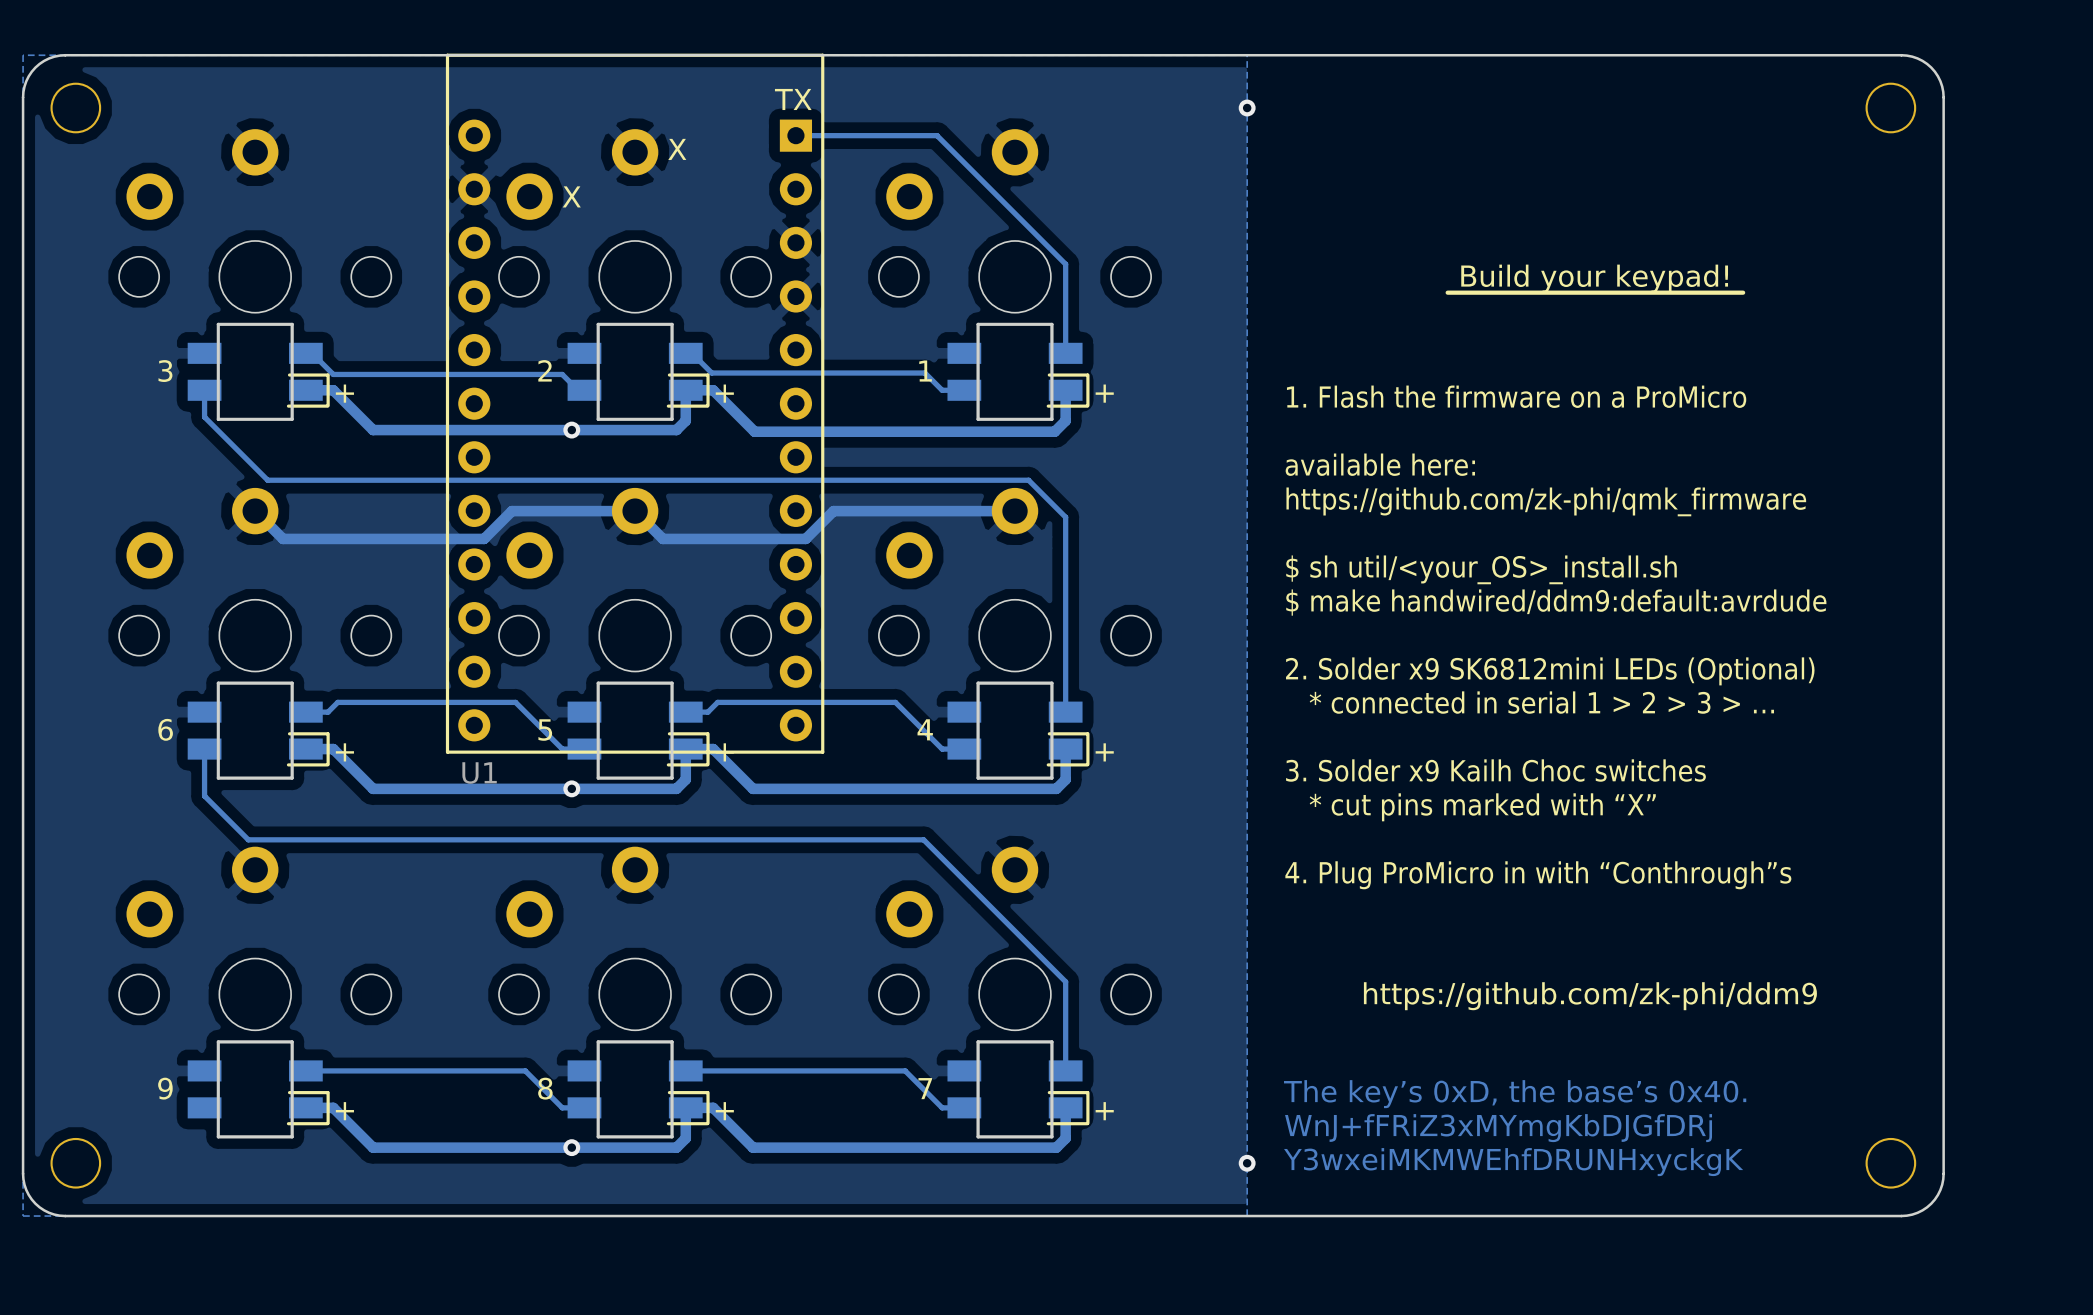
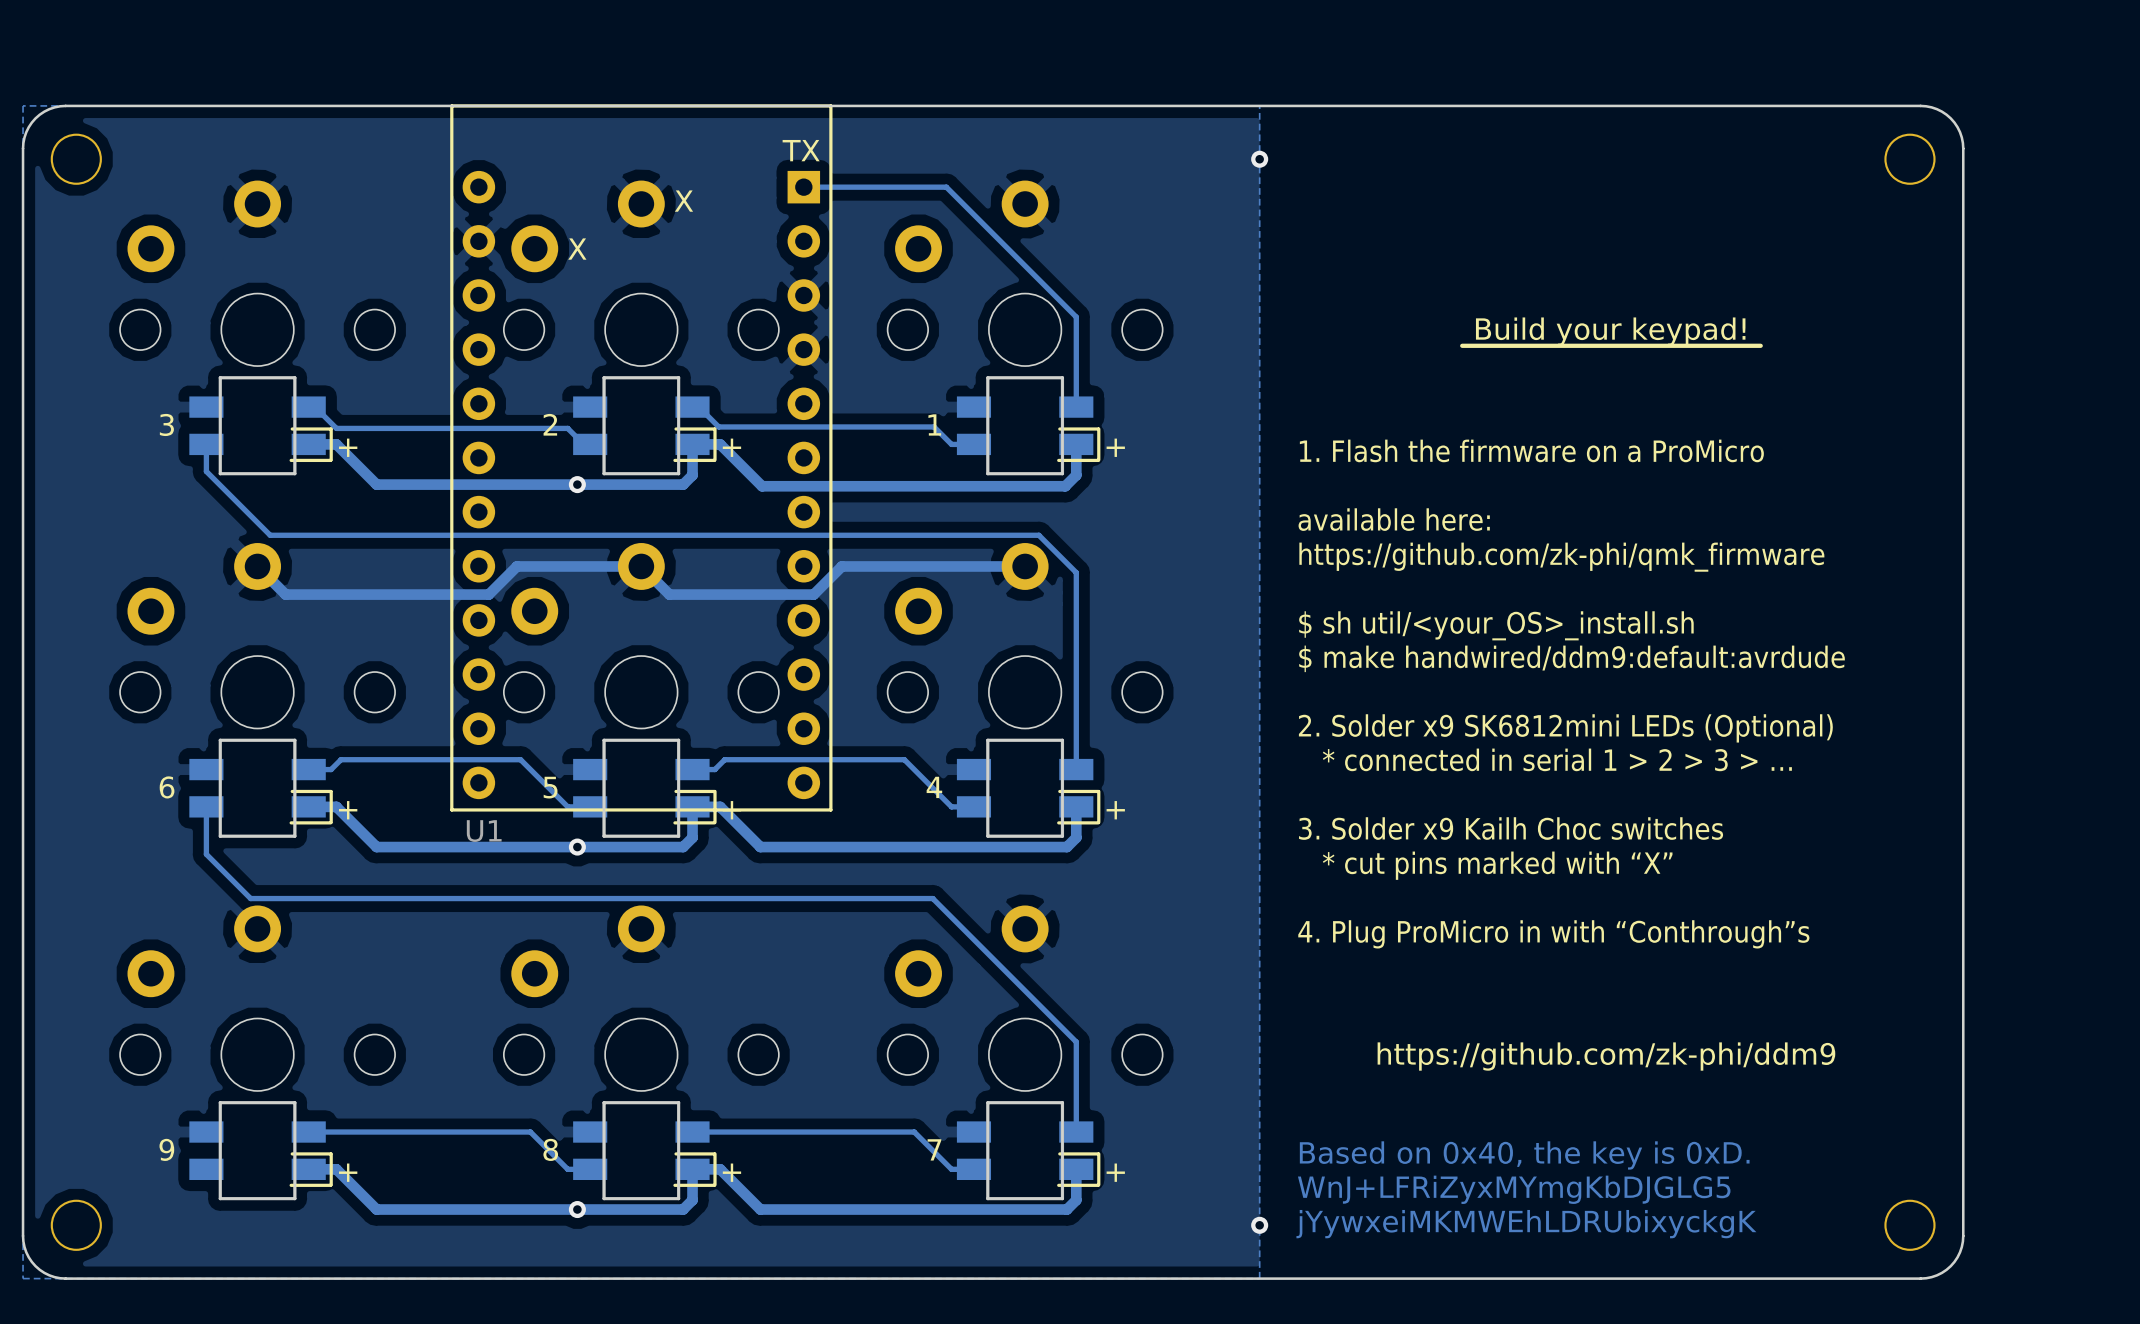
text: The key’s 0xD, the base’s 0x40. (1515, 1094) -> Based on 0x40, the key is 0xD. (1524, 1155)
text: WnJ+fFRiZ3xMYmgKbDJGfDRj (1498, 1128) -> WnJ+LFRiZyxMYmgKbDJGLG5 (1514, 1189)
text: Y3wxeiMKMWEhfDRUNHxyckgK (1513, 1162) -> jYywxeiMKMWEhLDRUbixyckgK (1526, 1224)

